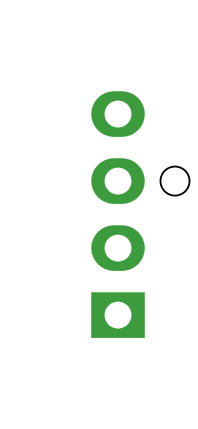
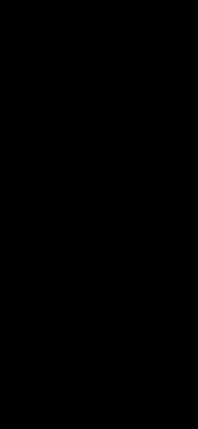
part: (140, 214) -> none

